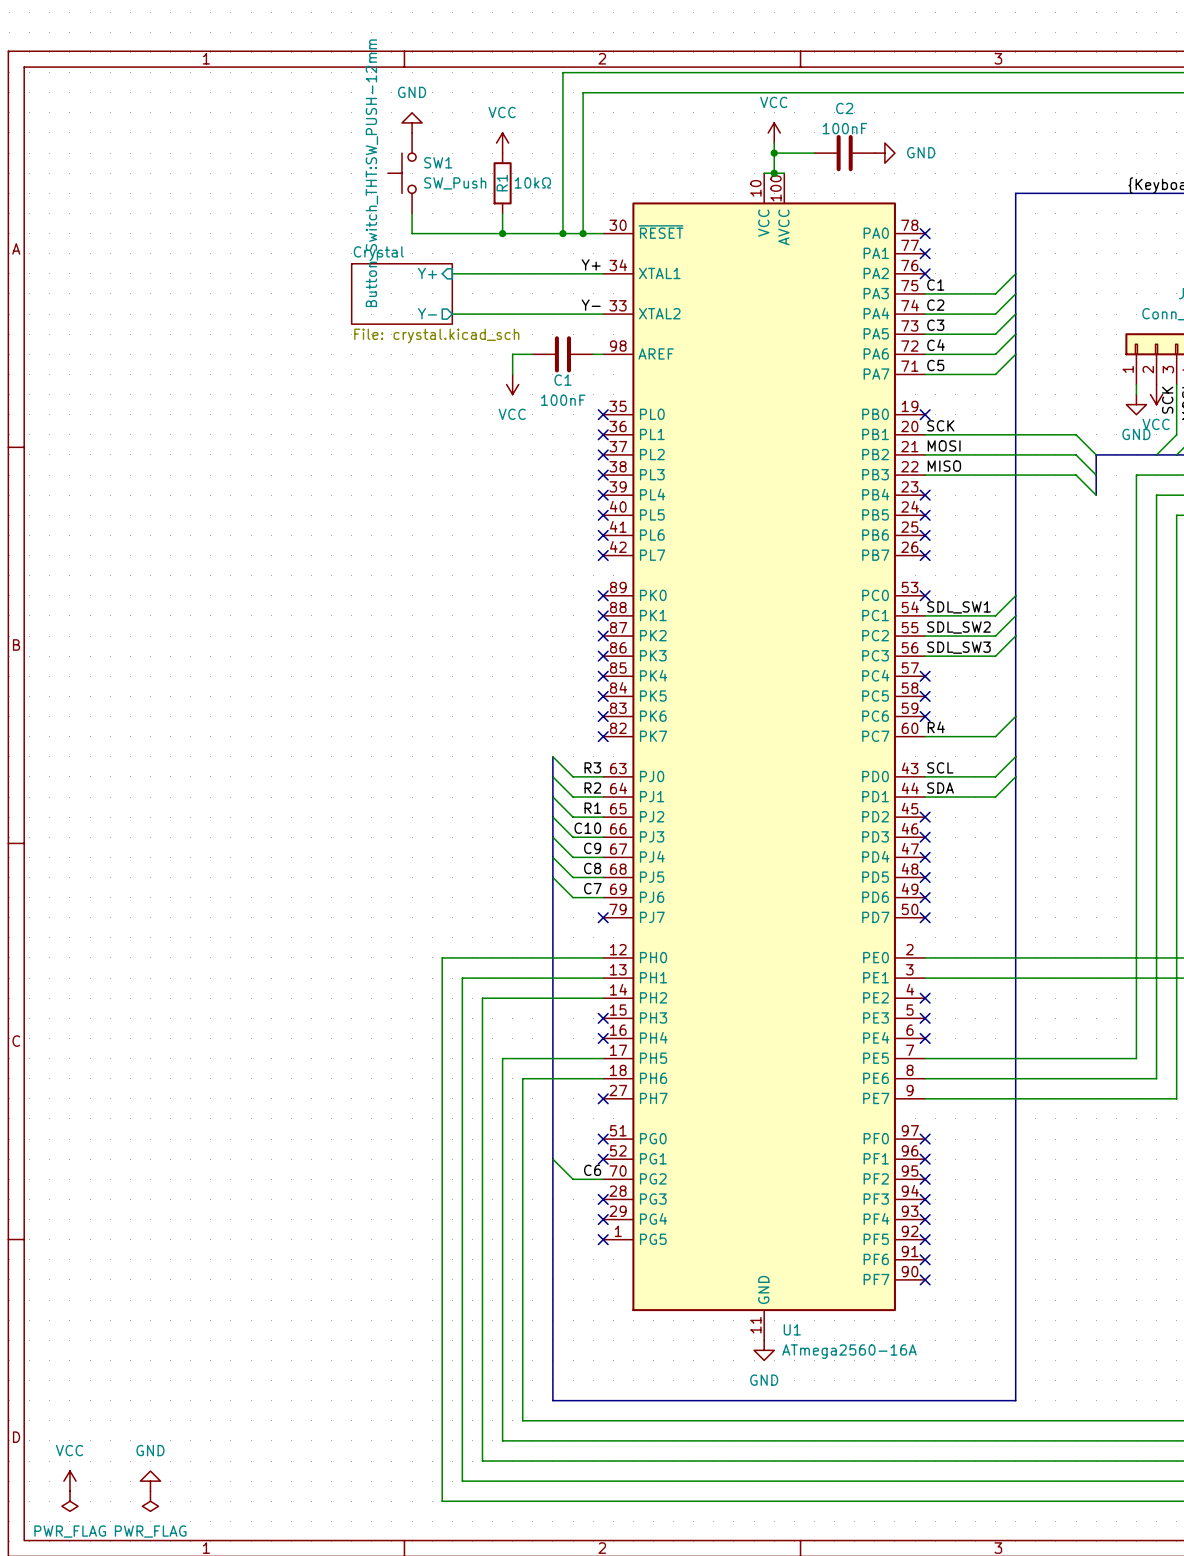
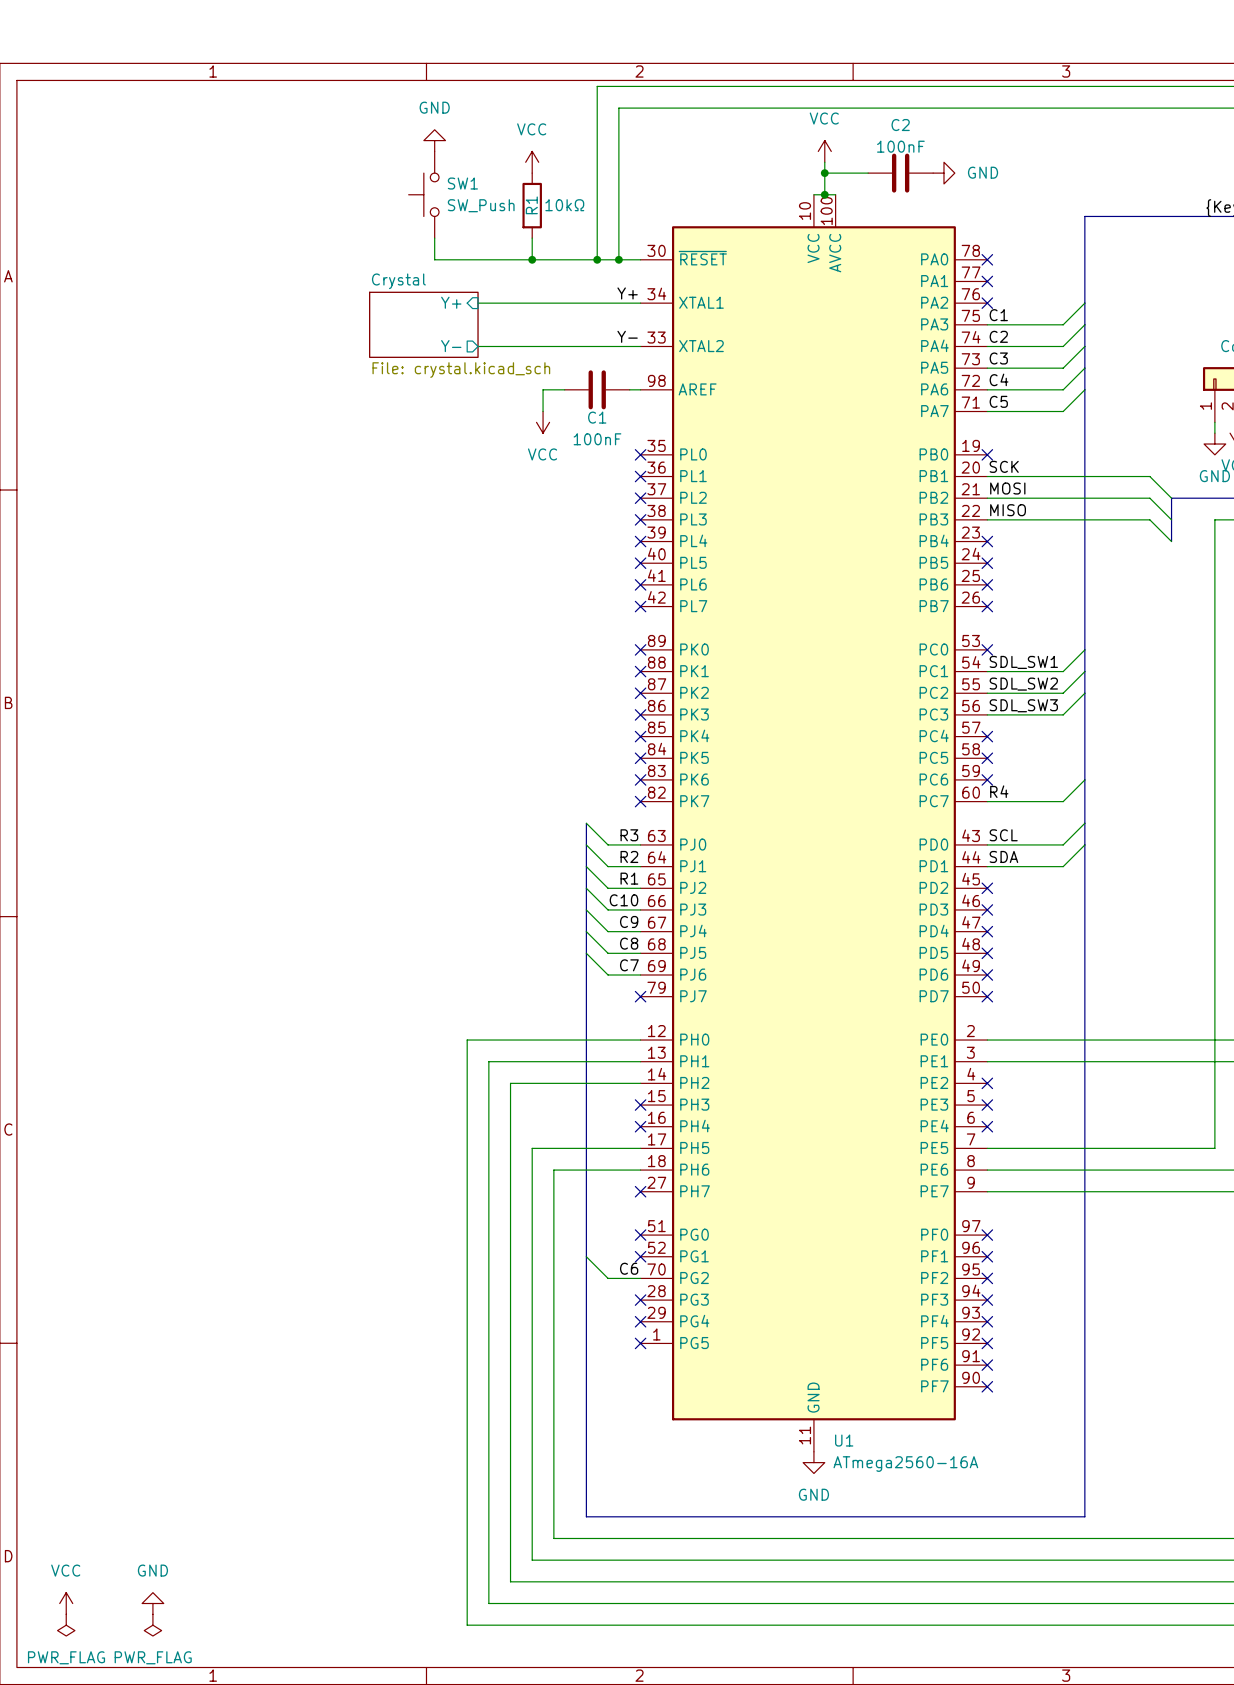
SW1 text: Button_Switch_THT:SW_PUSH-12mm (371, 173) -> none

